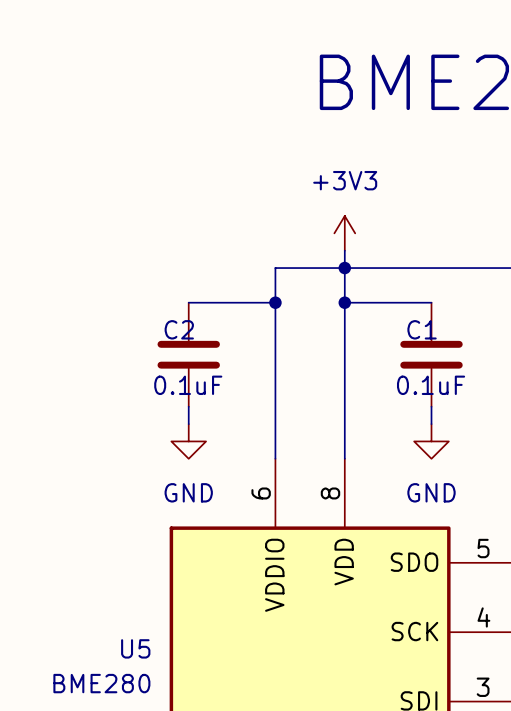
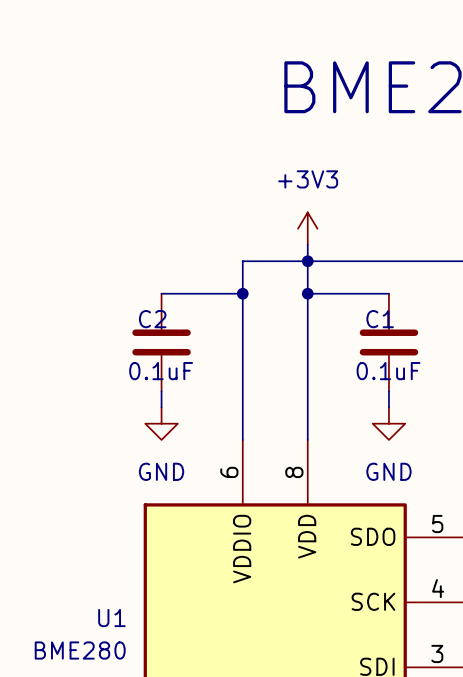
U5 name: U5 (135, 648) -> U1 (111, 618)

